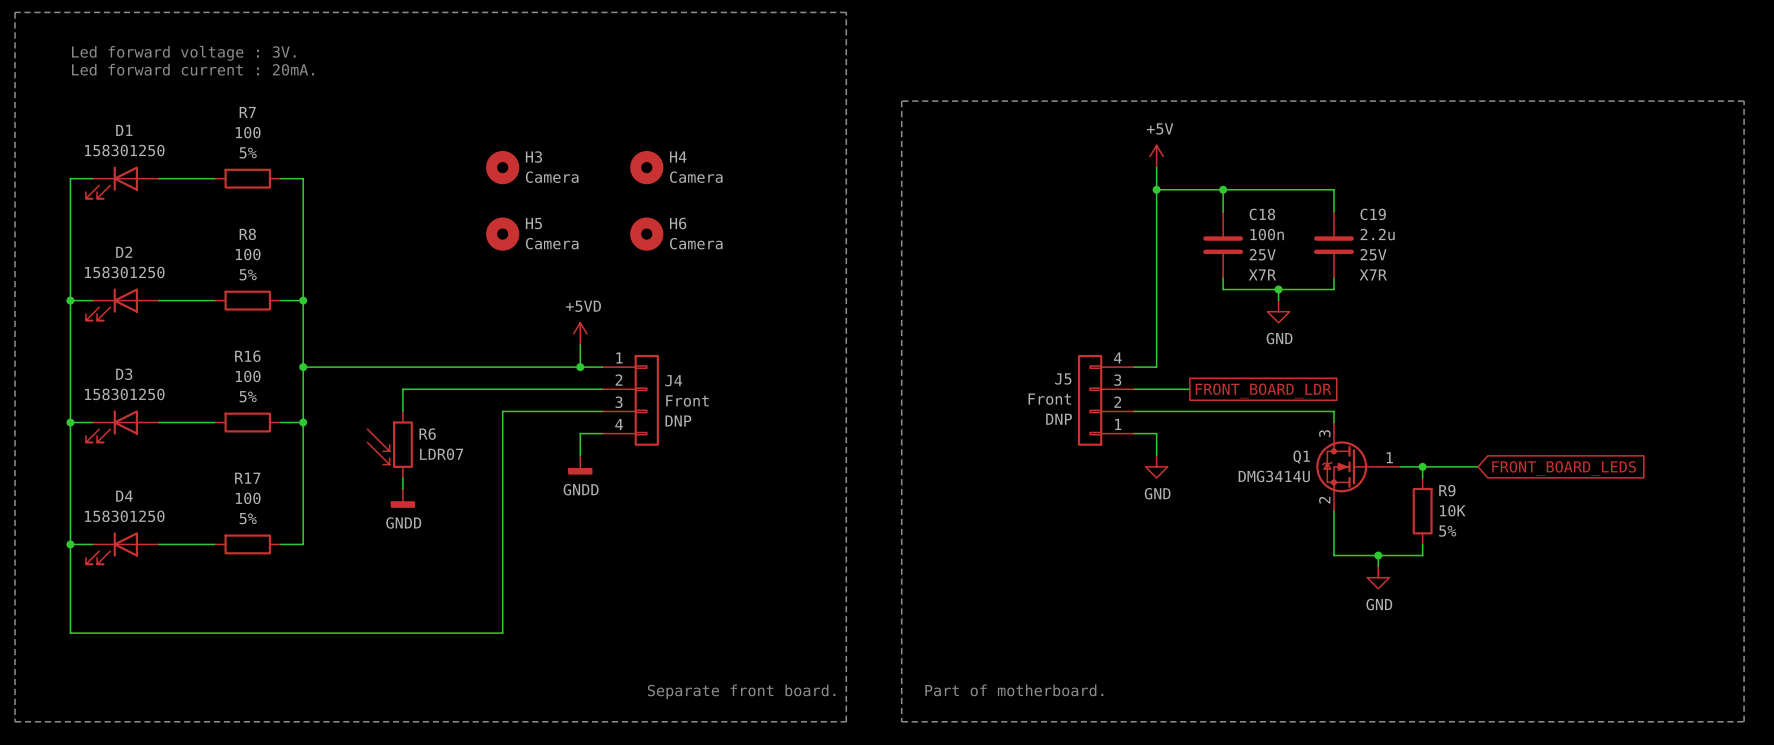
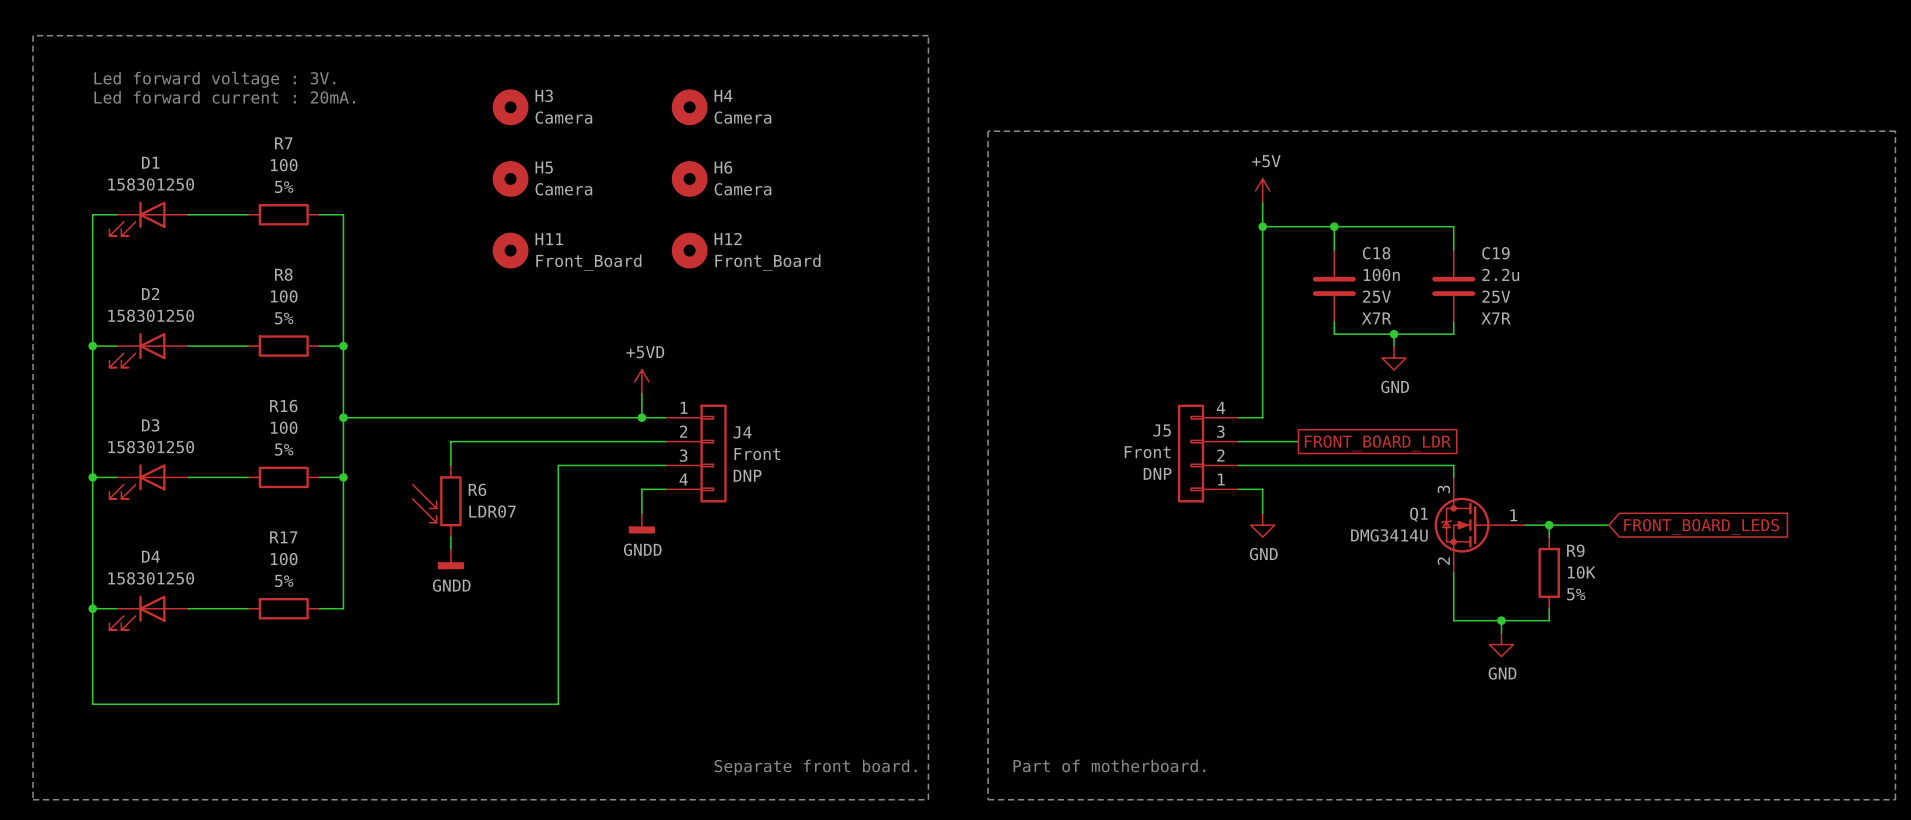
H3 position: (502, 167) -> (510, 107)
H4 position: (646, 167) -> (689, 107)
H11: none -> Front_Board (510, 250)
H12: none -> Front_Board (689, 250)
H5 position: (502, 234) -> (510, 178)
H6 position: (646, 234) -> (689, 178)

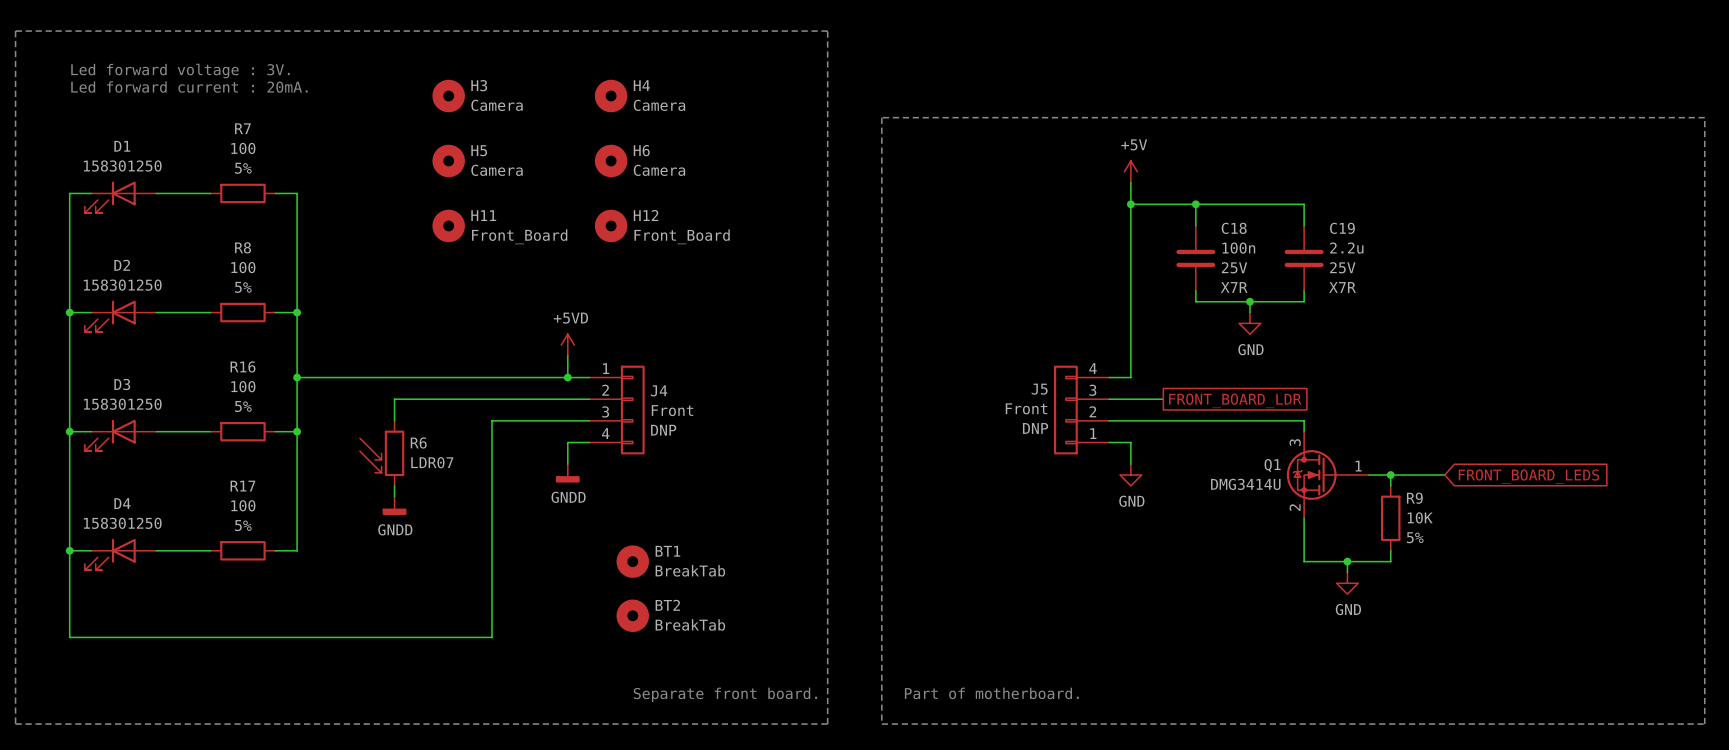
BT1: none -> BreakTab (632, 561)
BT2: none -> BreakTab (632, 615)

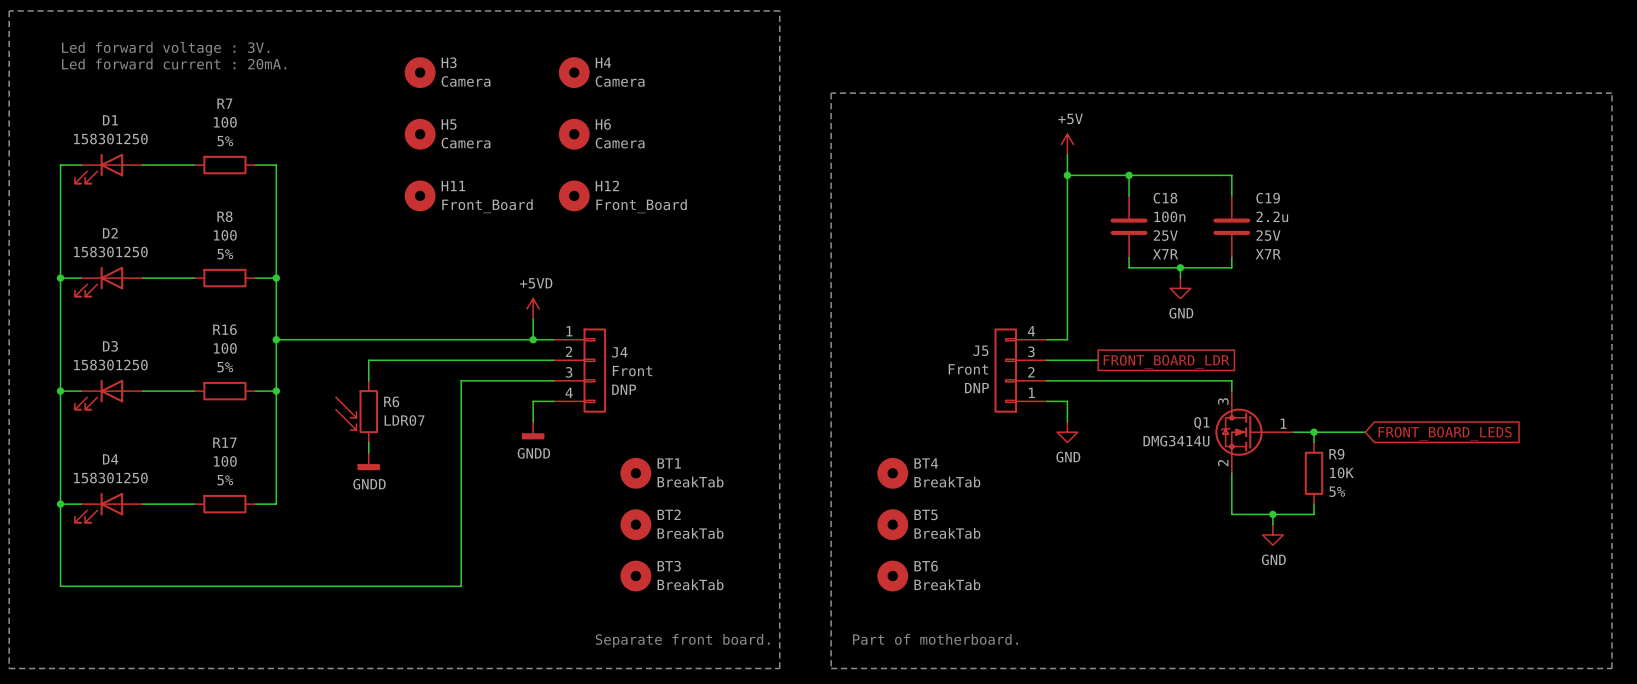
BT4: none -> BreakTab (892, 473)
BT1 position: (632, 561) -> (635, 473)
BT5: none -> BreakTab (892, 524)
BT2 position: (632, 615) -> (635, 524)
BT3: none -> BreakTab (635, 576)
BT6: none -> BreakTab (892, 576)

